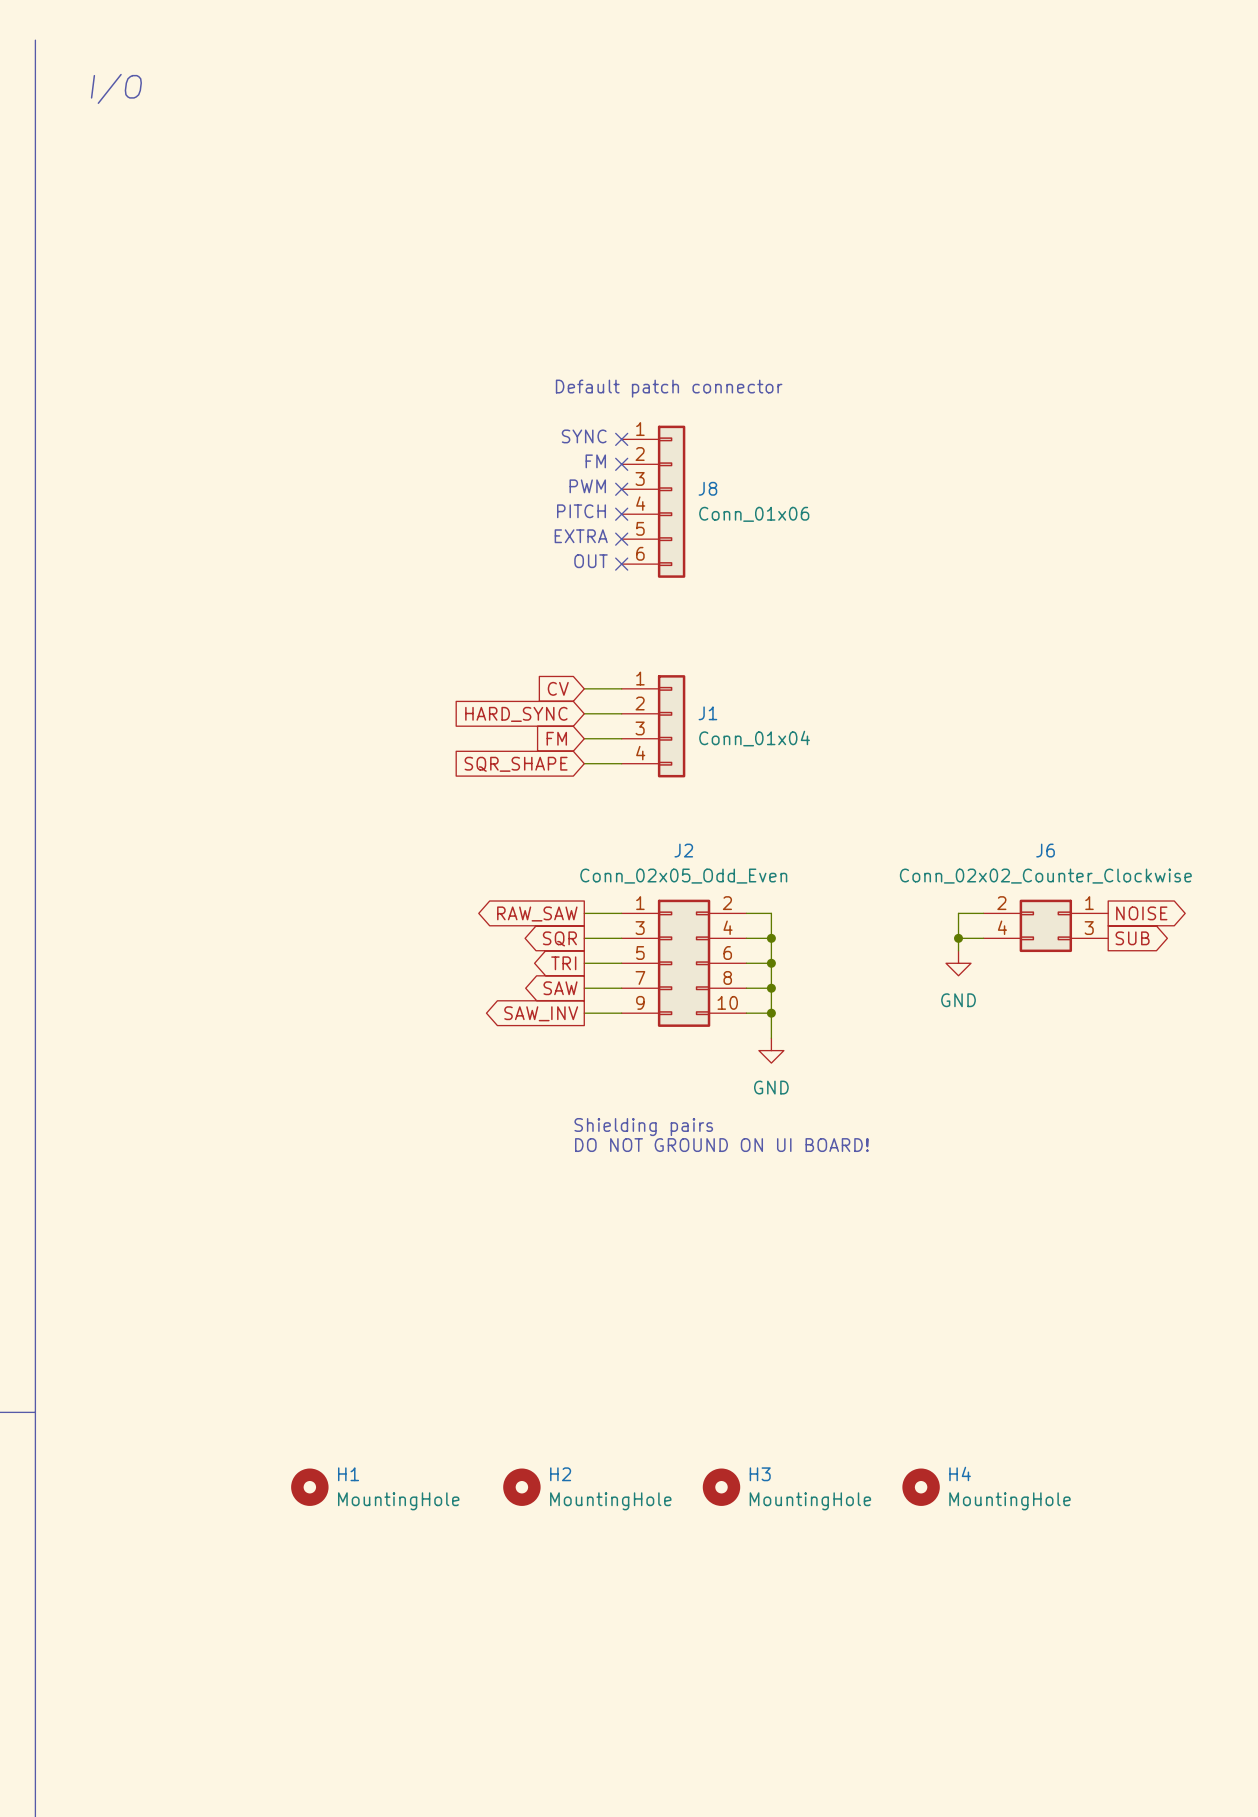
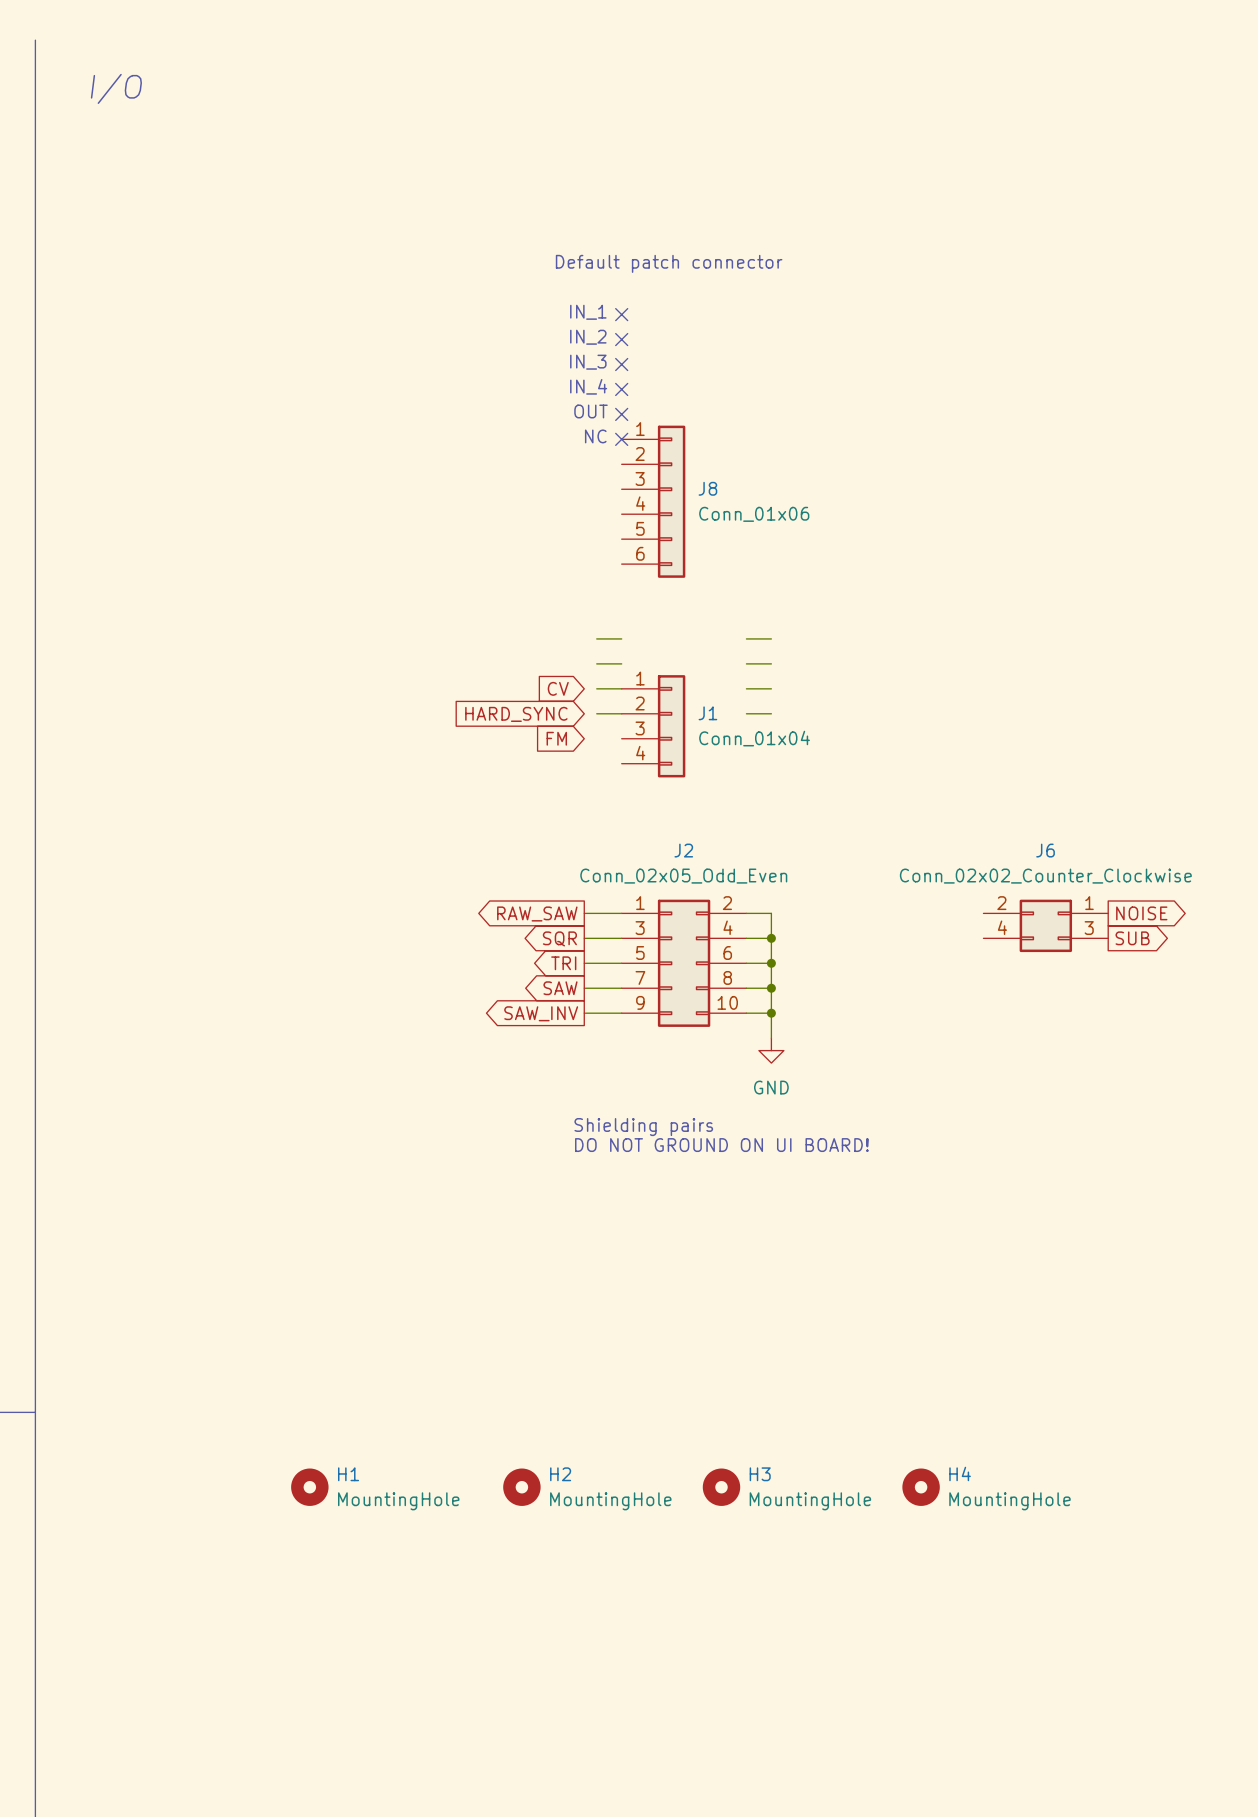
text: none -> IN_1 (588, 312)
no-connect mark: none -> (621, 314)
text: none -> IN_2 (588, 337)
no-connect mark: none -> (621, 339)
text: none -> IN_3 (588, 362)
no-connect mark: none -> (621, 364)
text: none -> IN_4 (588, 386)
text position: Default patch connector (669, 388) -> Default patch connector (669, 263)
no-connect mark: none -> (621, 389)
no-connect mark: none -> (621, 414)
text: SYNC (584, 436) -> NC (595, 436)
text: FM (595, 461) -> none
no-connect mark: (621, 464) -> none
text: PWM (587, 486) -> none
no-connect mark: (621, 489) -> none
text: PITCH (581, 511) -> none
no-connect mark: (621, 514) -> none
text: EXTRA (581, 536) -> none
no-connect mark: (621, 539) -> none
text position: OUT (591, 561) -> OUT (591, 411)
no-connect mark: (621, 564) -> none
wire: none -> (596, 638) (621, 638)
wire: none -> (746, 638) (771, 638)
wire: none -> (596, 663) (621, 663)
wire: none -> (746, 663) (771, 663)
wire: (584, 688) (596, 688) -> none
wire: none -> (746, 688) (771, 688)
wire: (584, 713) (596, 713) -> none
wire: none -> (746, 713) (771, 713)
wire: (584, 738) (621, 738) -> none
wire: (584, 763) (621, 763) -> none
global label: SQR_SHAPE (516, 764) -> none
wire: (983, 913) (958, 913) (958, 950) -> none
wire: (958, 938) (983, 938) -> none
junction: (958, 938) -> none
power symbol: GND (958, 963) -> none

